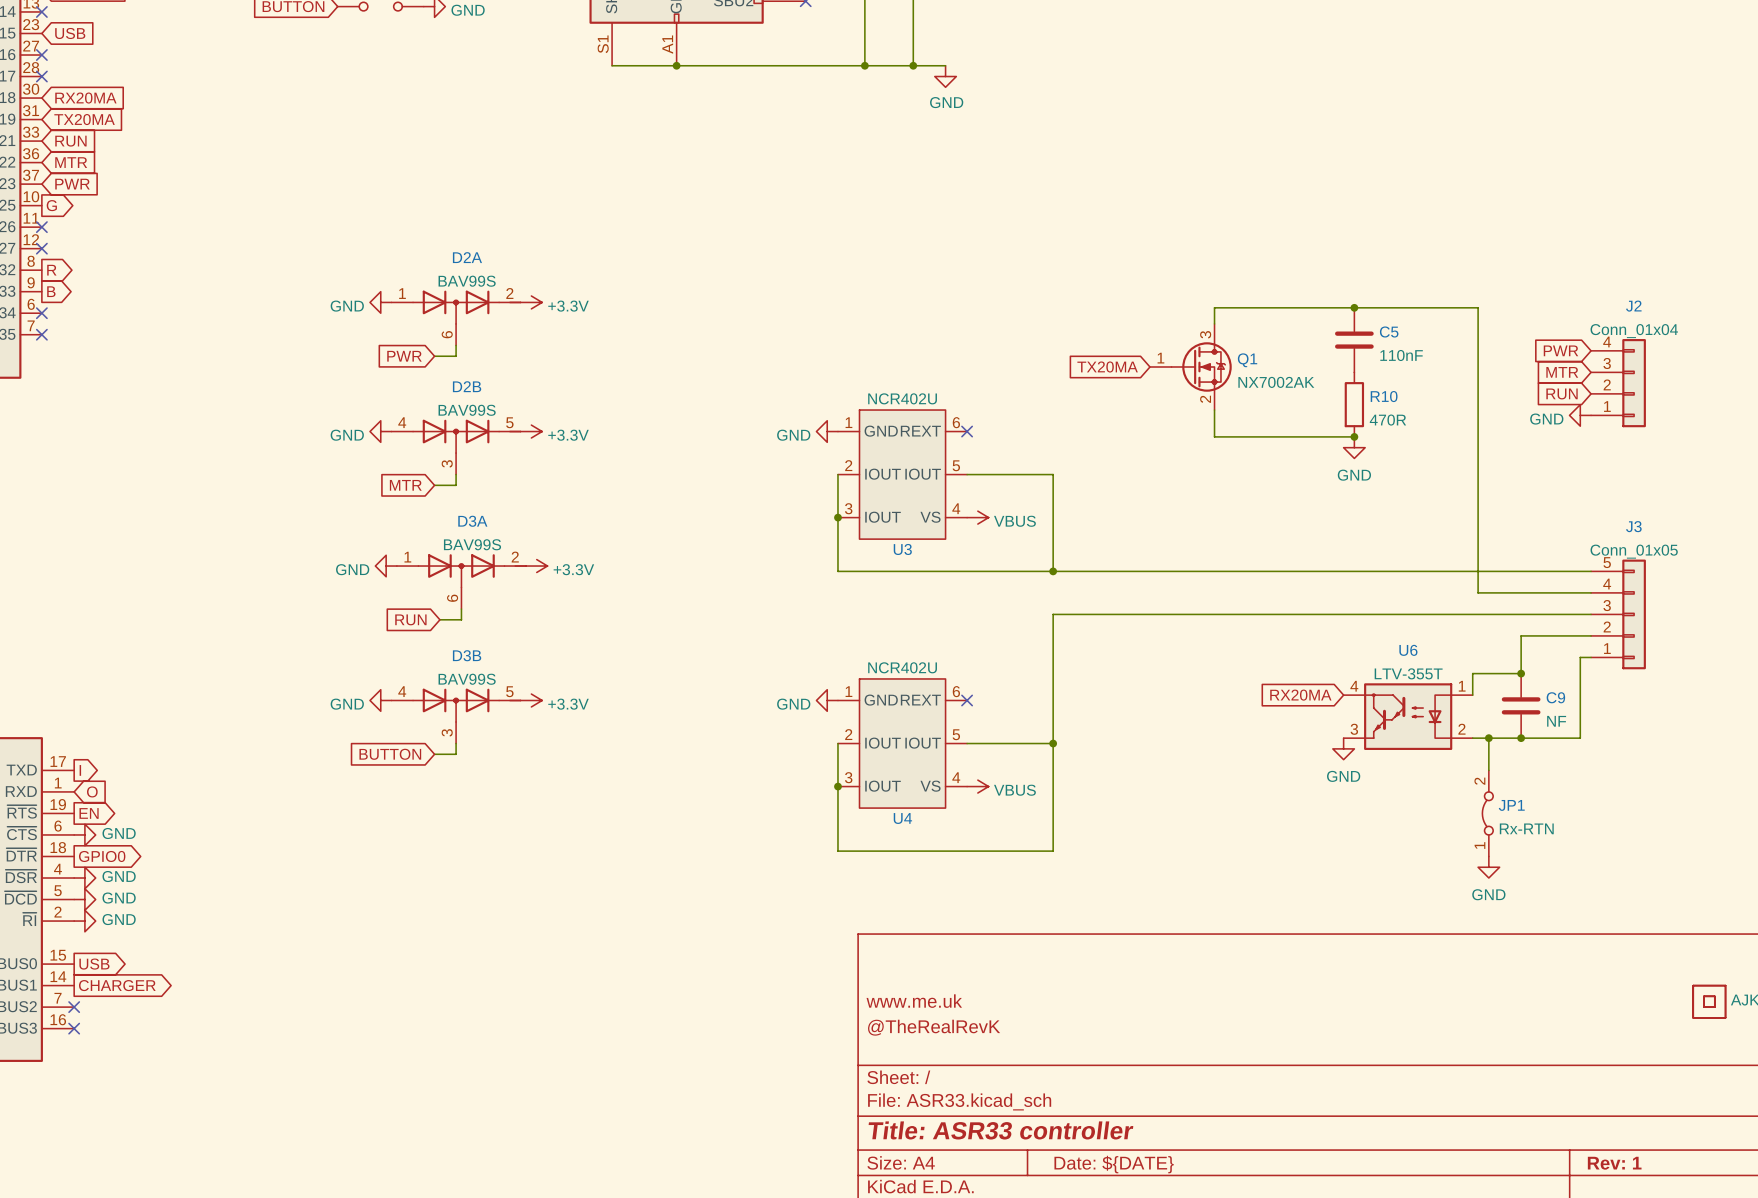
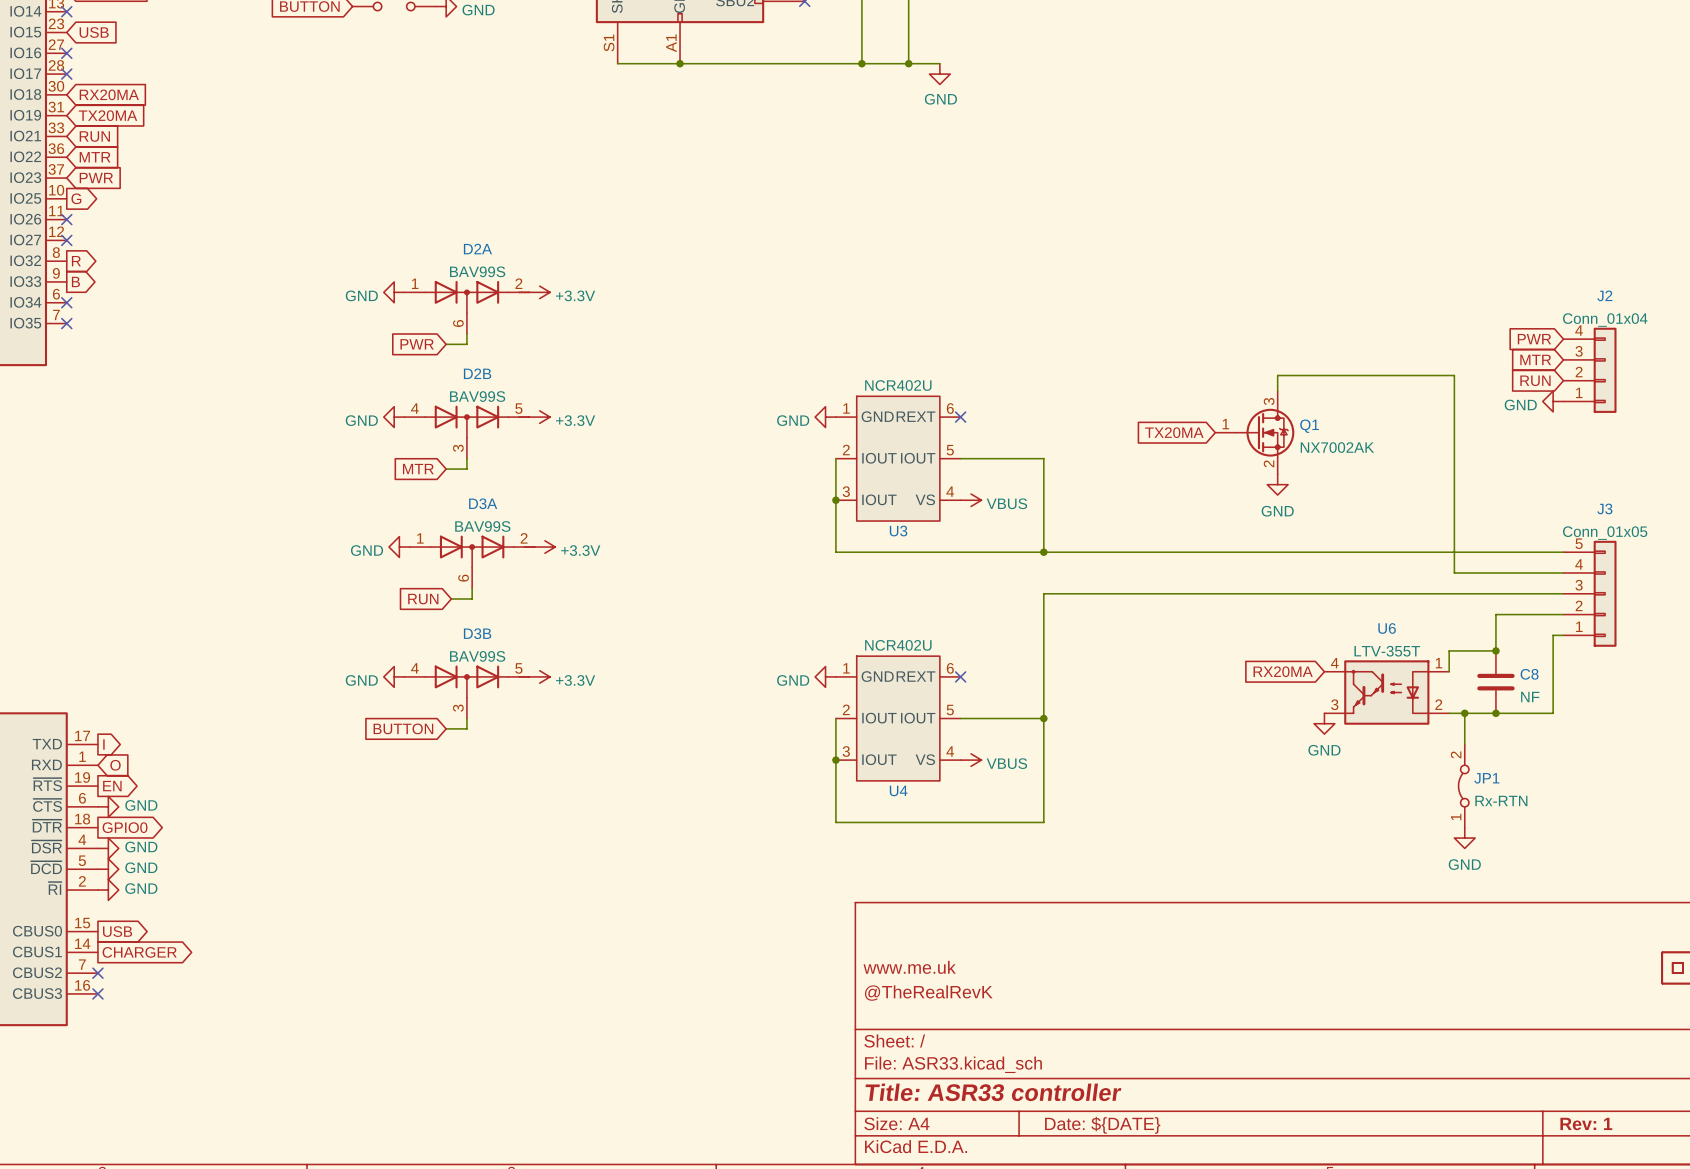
junction: (1354, 307) -> none
wire: (1214, 323) (1214, 307) (1478, 307) (1478, 388) -> (1277, 391) (1277, 375) (1454, 375)
C5: 110nF (1354, 340) -> none
global label position: TX20MA (1107, 366) -> TX20MA (1174, 432)
Q1 position: (1190, 366) -> (1254, 432)
R10: 470R (1354, 404) -> none
wire: (1214, 410) (1214, 436) (1354, 436) -> none
junction: (1354, 436) -> none
power symbol position: GND (1354, 447) -> GND (1277, 484)
C9 name: C9 (1555, 697) -> C8 (1529, 674)

